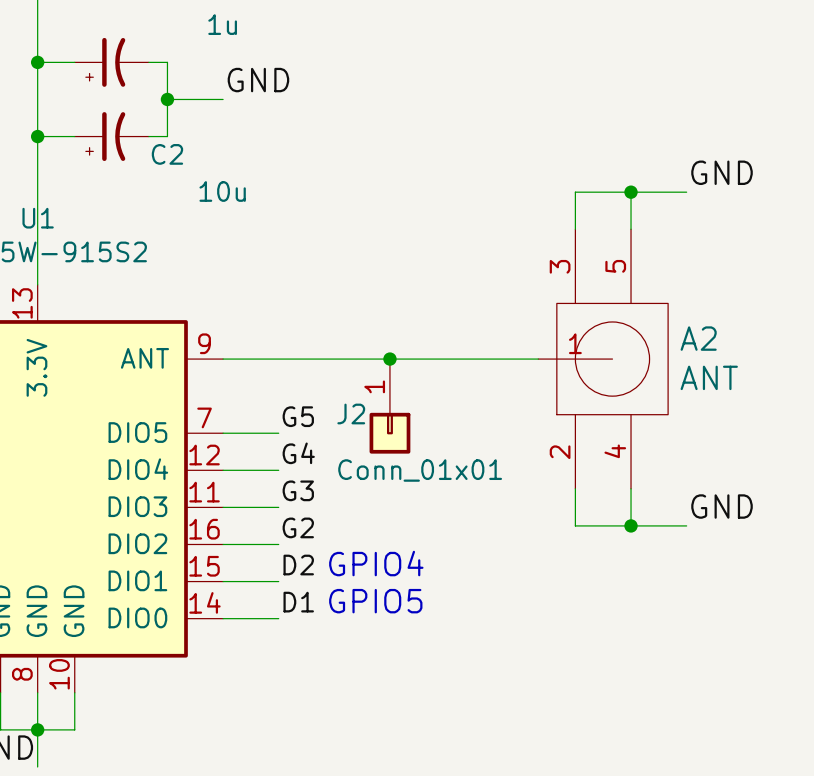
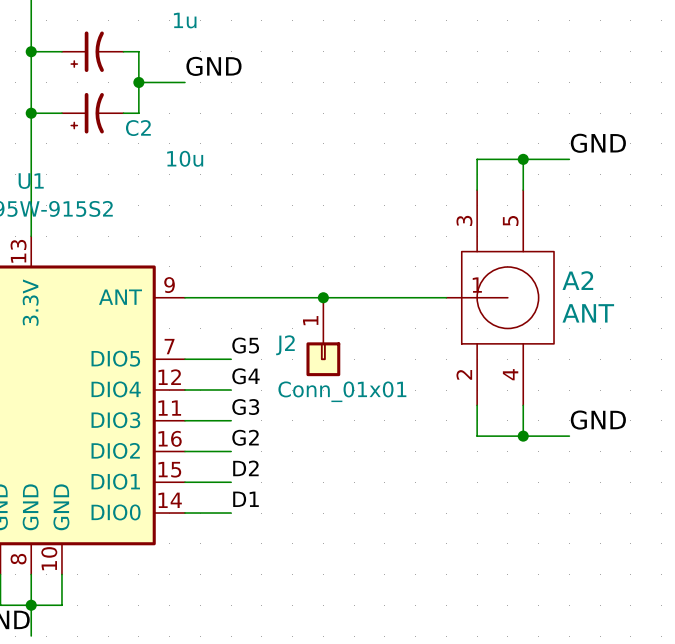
text: GPIO4 (376, 563) -> none
text: GPIO5 (375, 601) -> none

